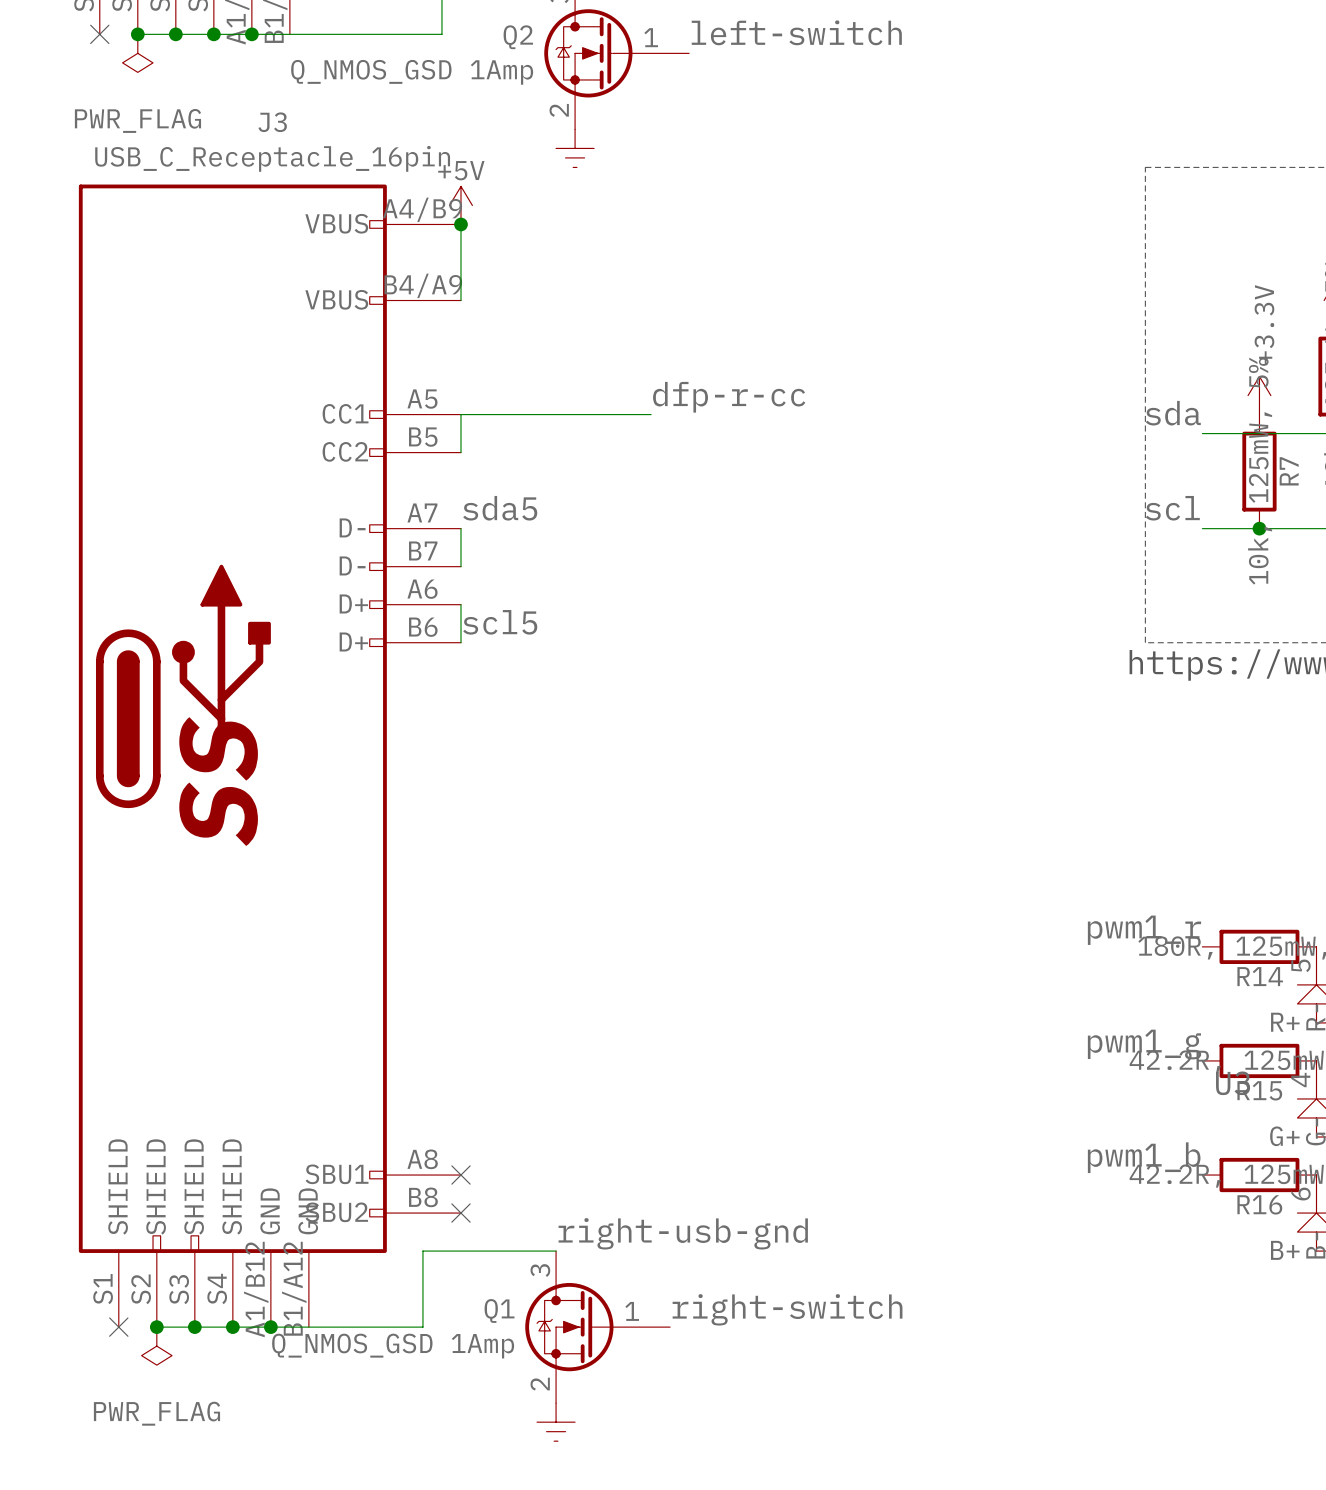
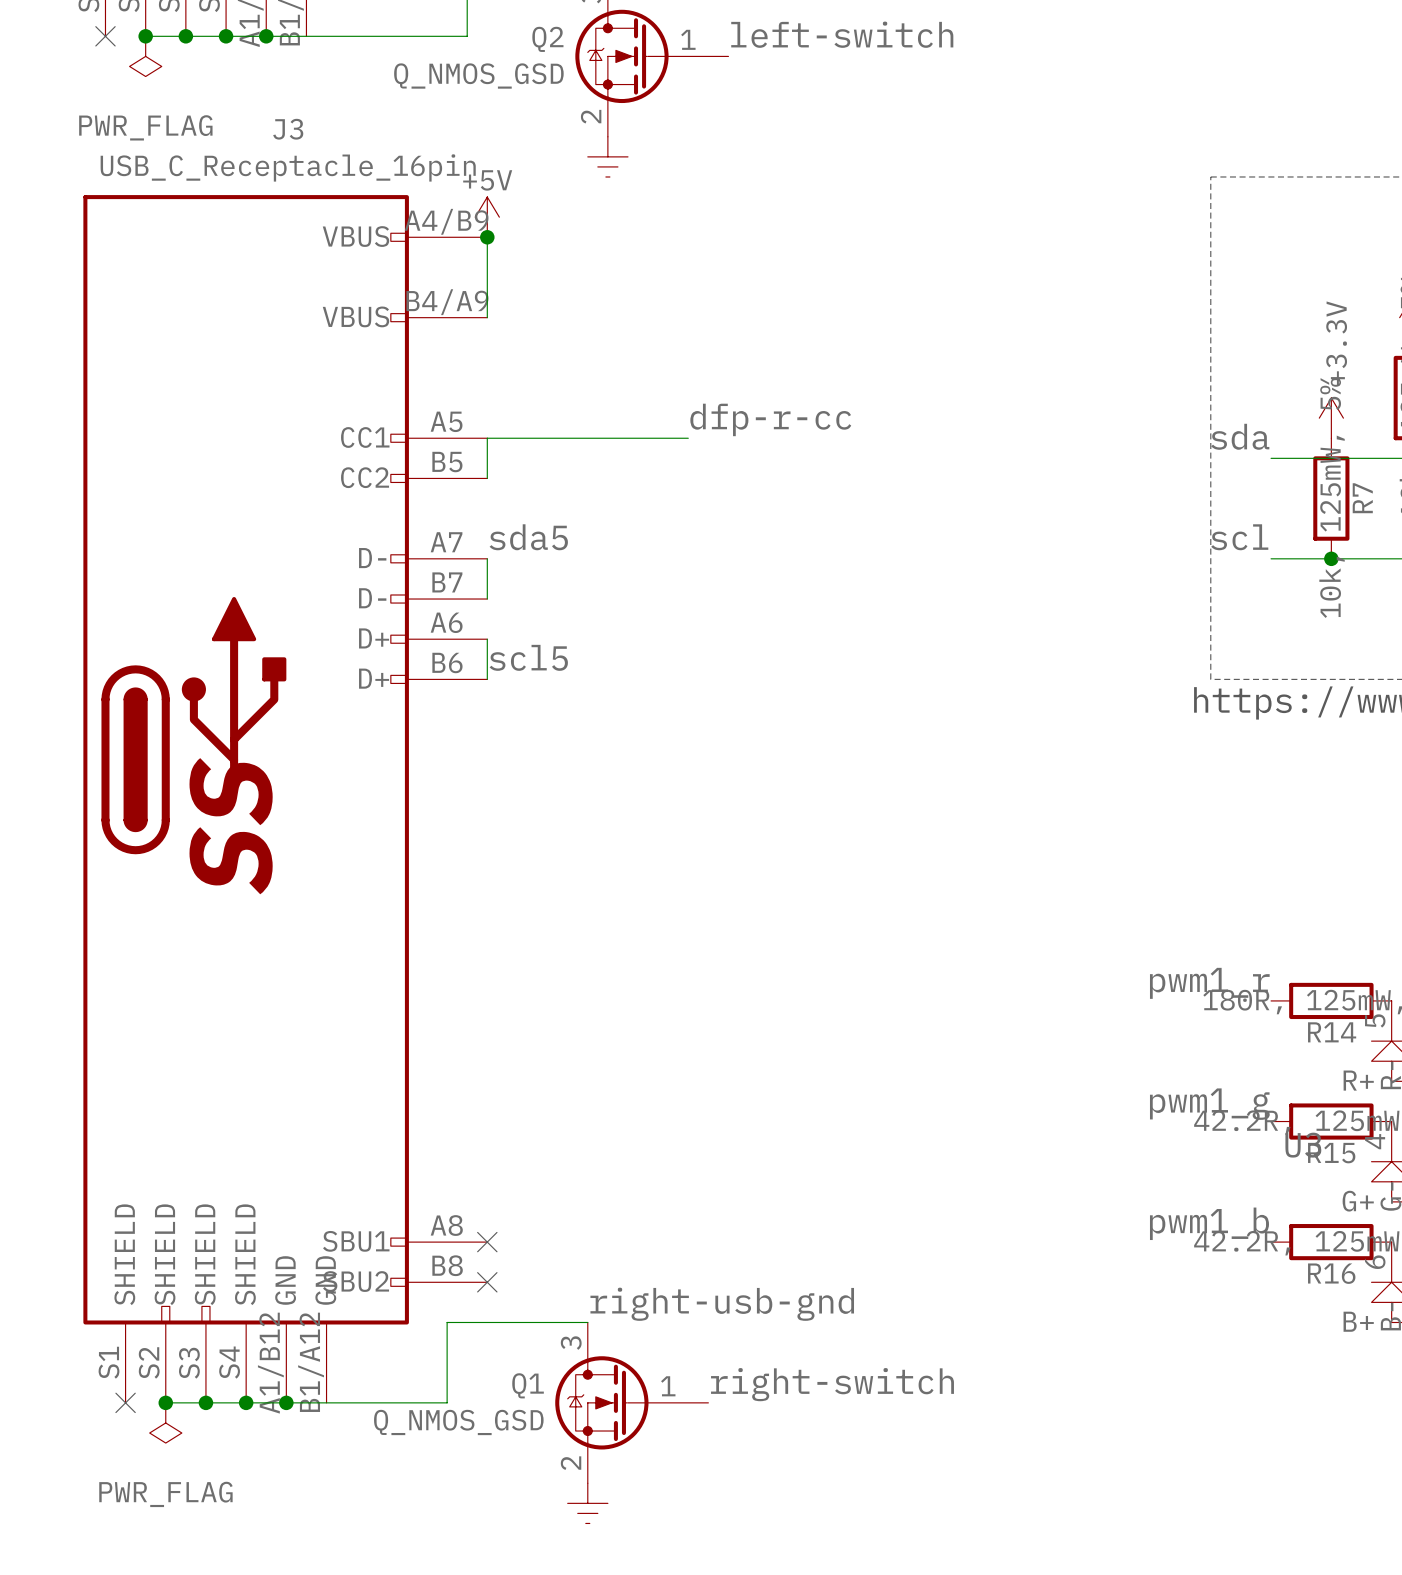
Q2 value: Q_NMOS_GSD 1Amp (412, 72) -> Q_NMOS_GSD (478, 76)
Q1 value: Q_NMOS_GSD 1Amp (393, 1346) -> Q_NMOS_GSD (458, 1422)

